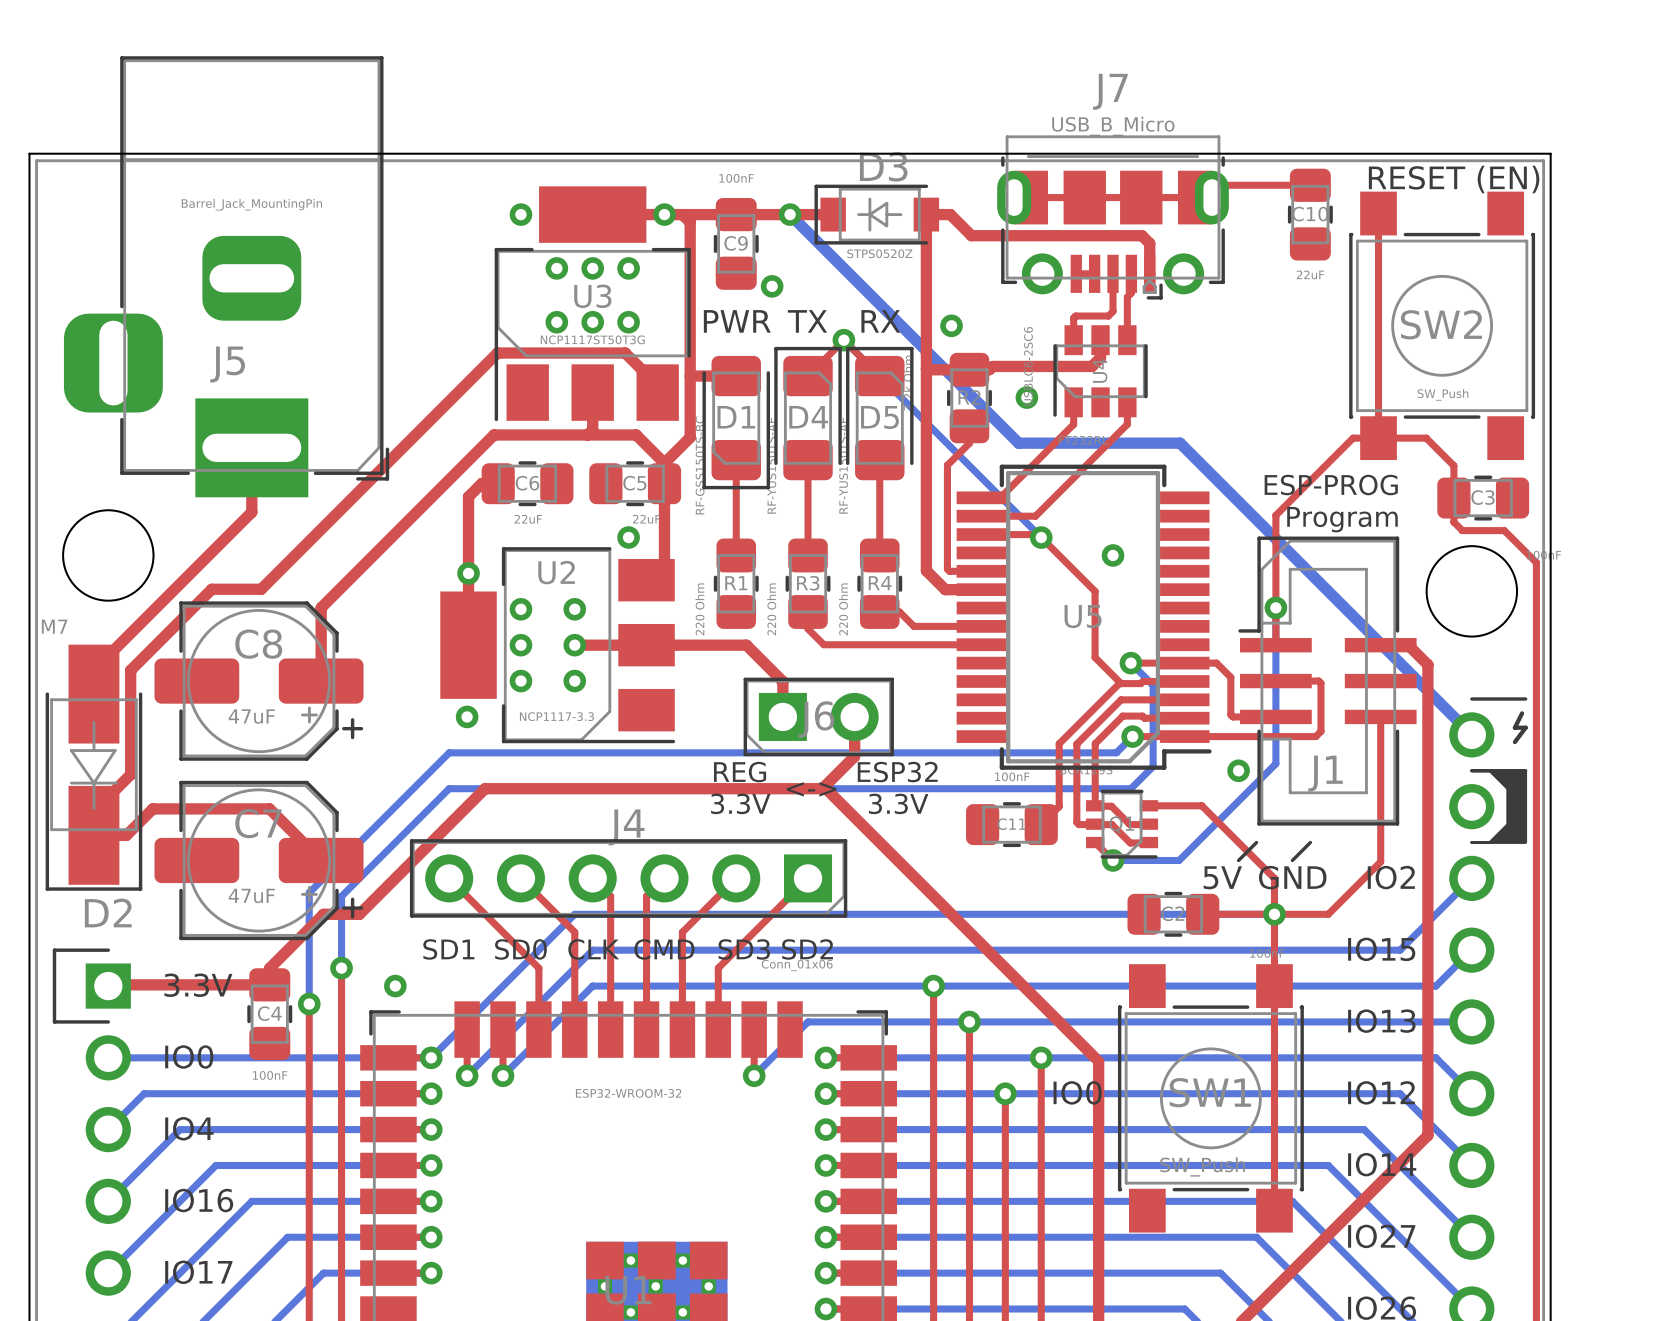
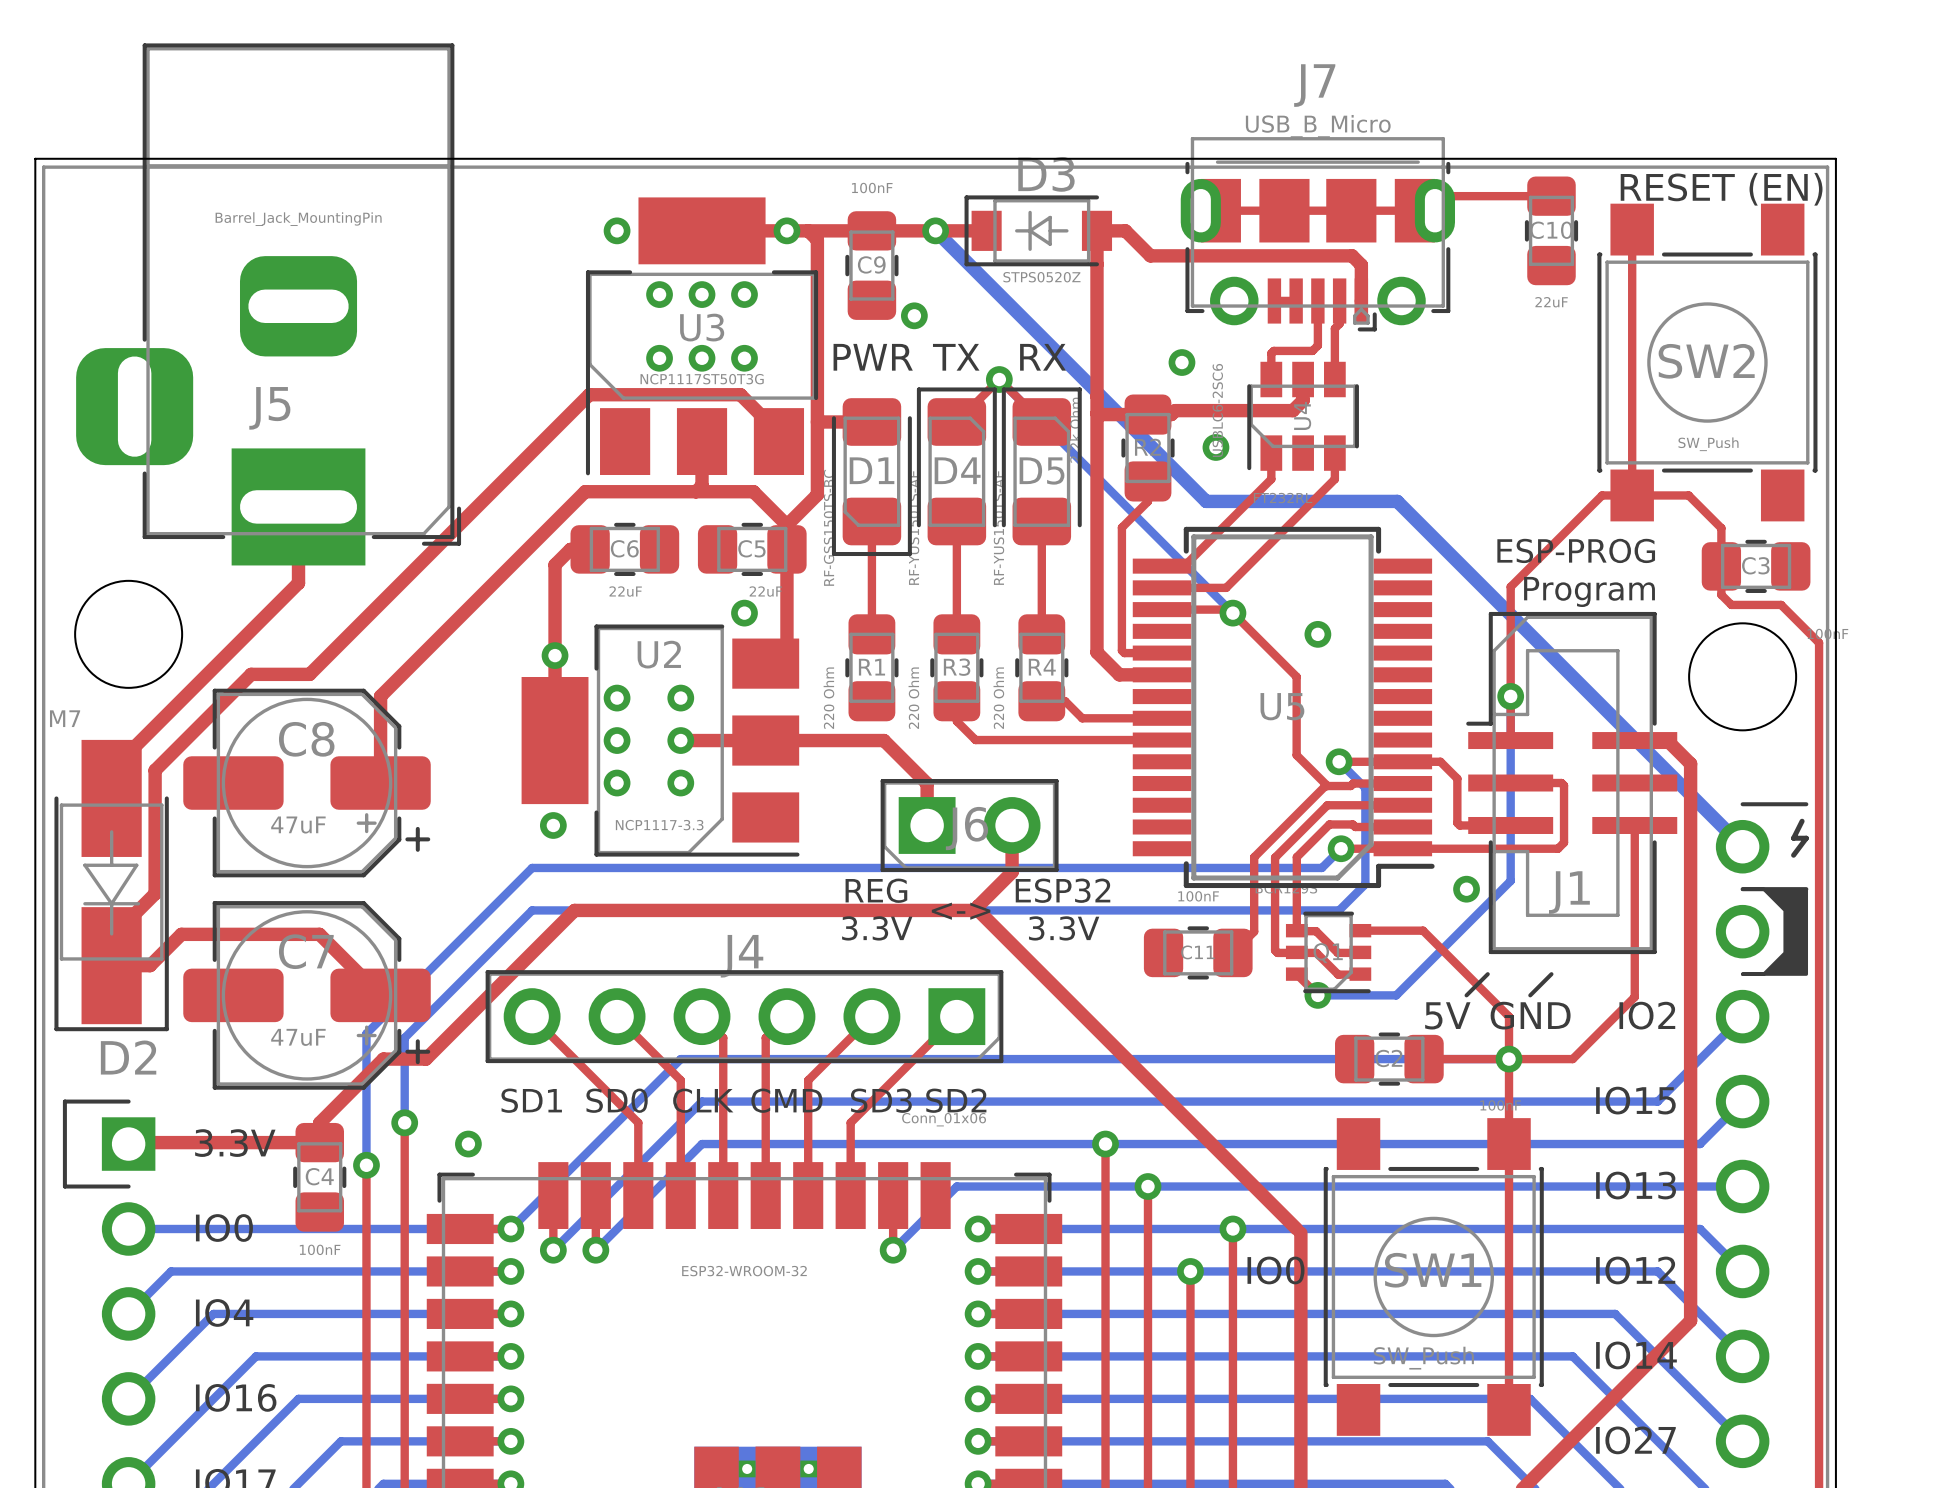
via position: (951, 325) -> (1181, 362)

